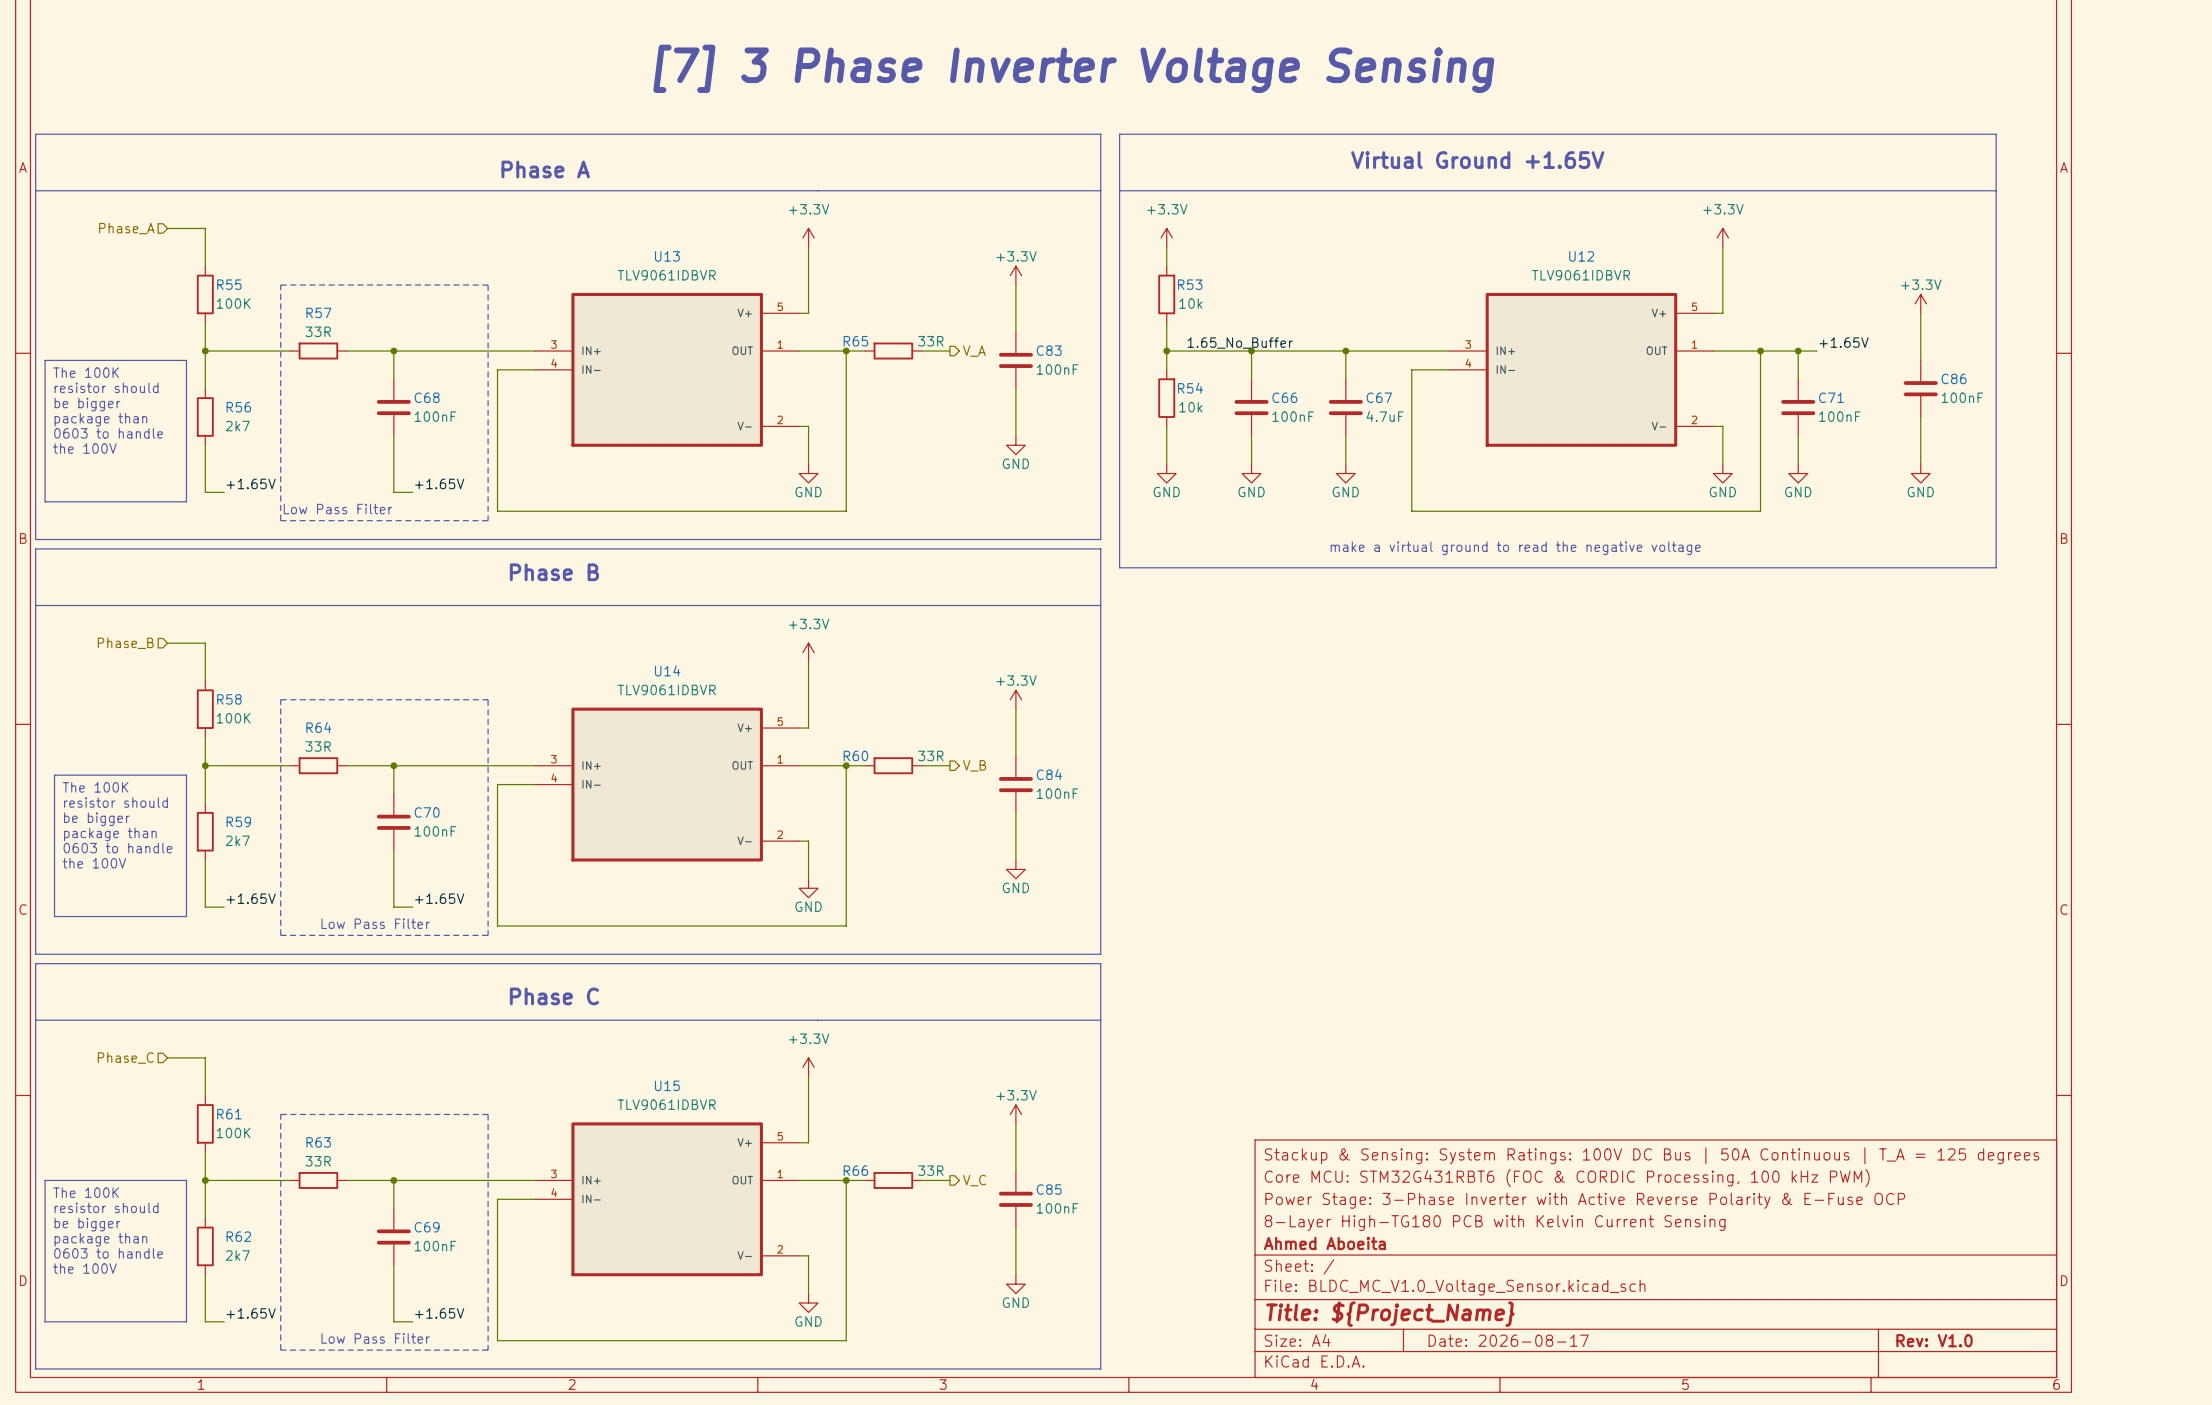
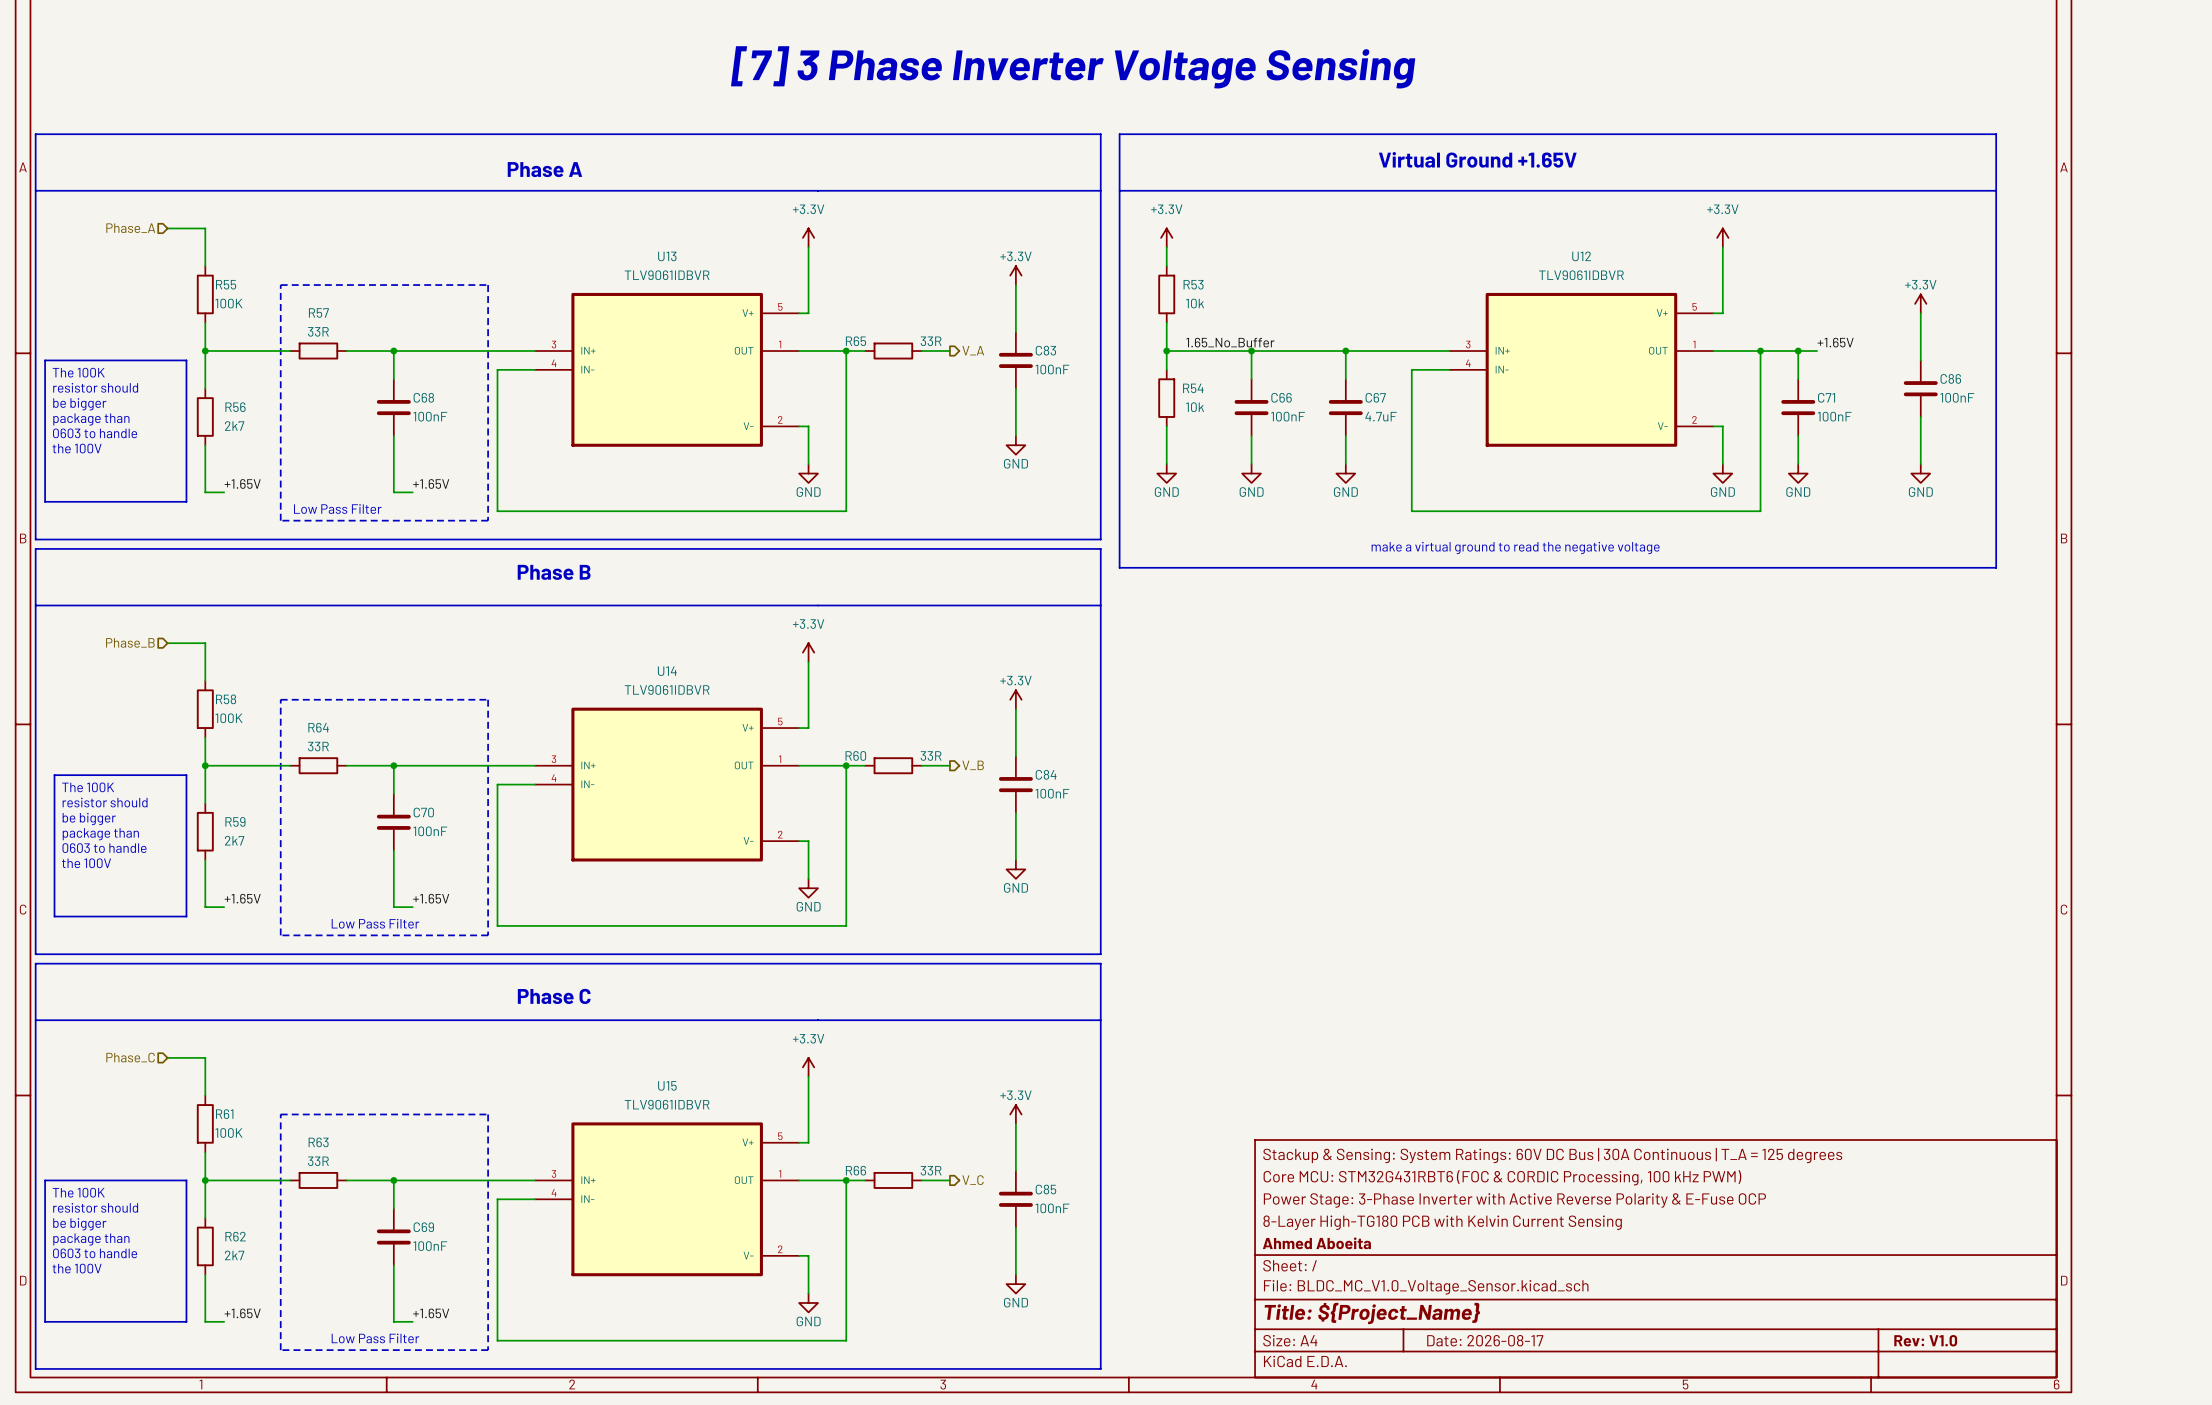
title block: Stackup & Sensing: System Ratings: 100V DC Bus | 50A Continuous | T_A = 125 degrees (1652, 1155) -> Stackup & Sensing: System Ratings: 60V DC Bus | 30A Continuous | T_A = 125 degrees (1552, 1155)

